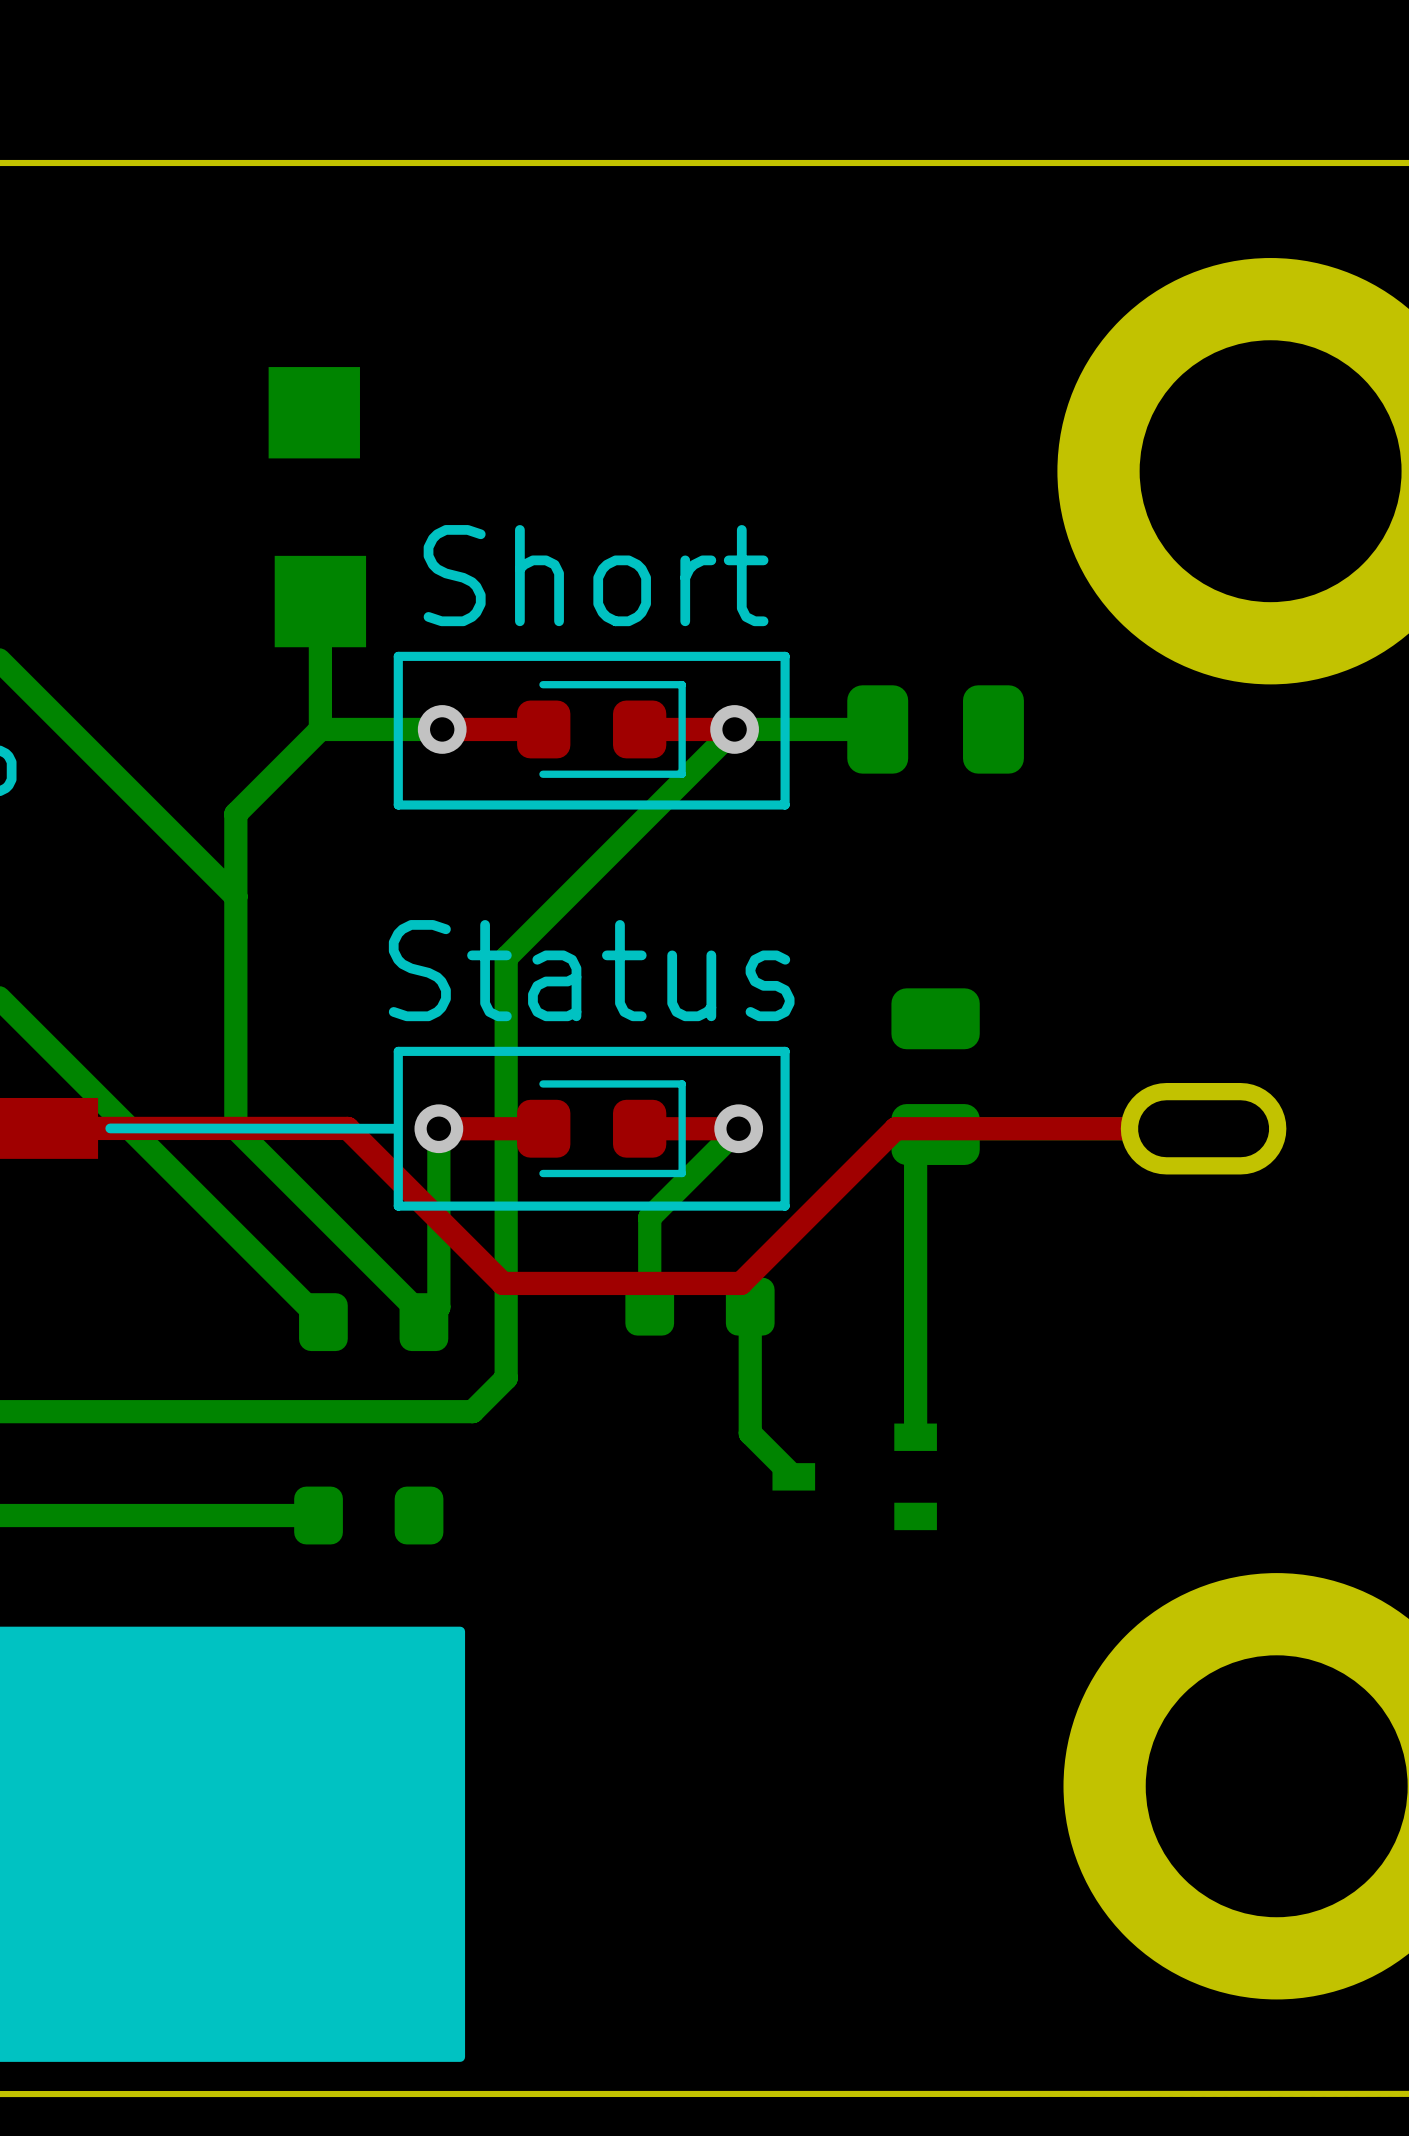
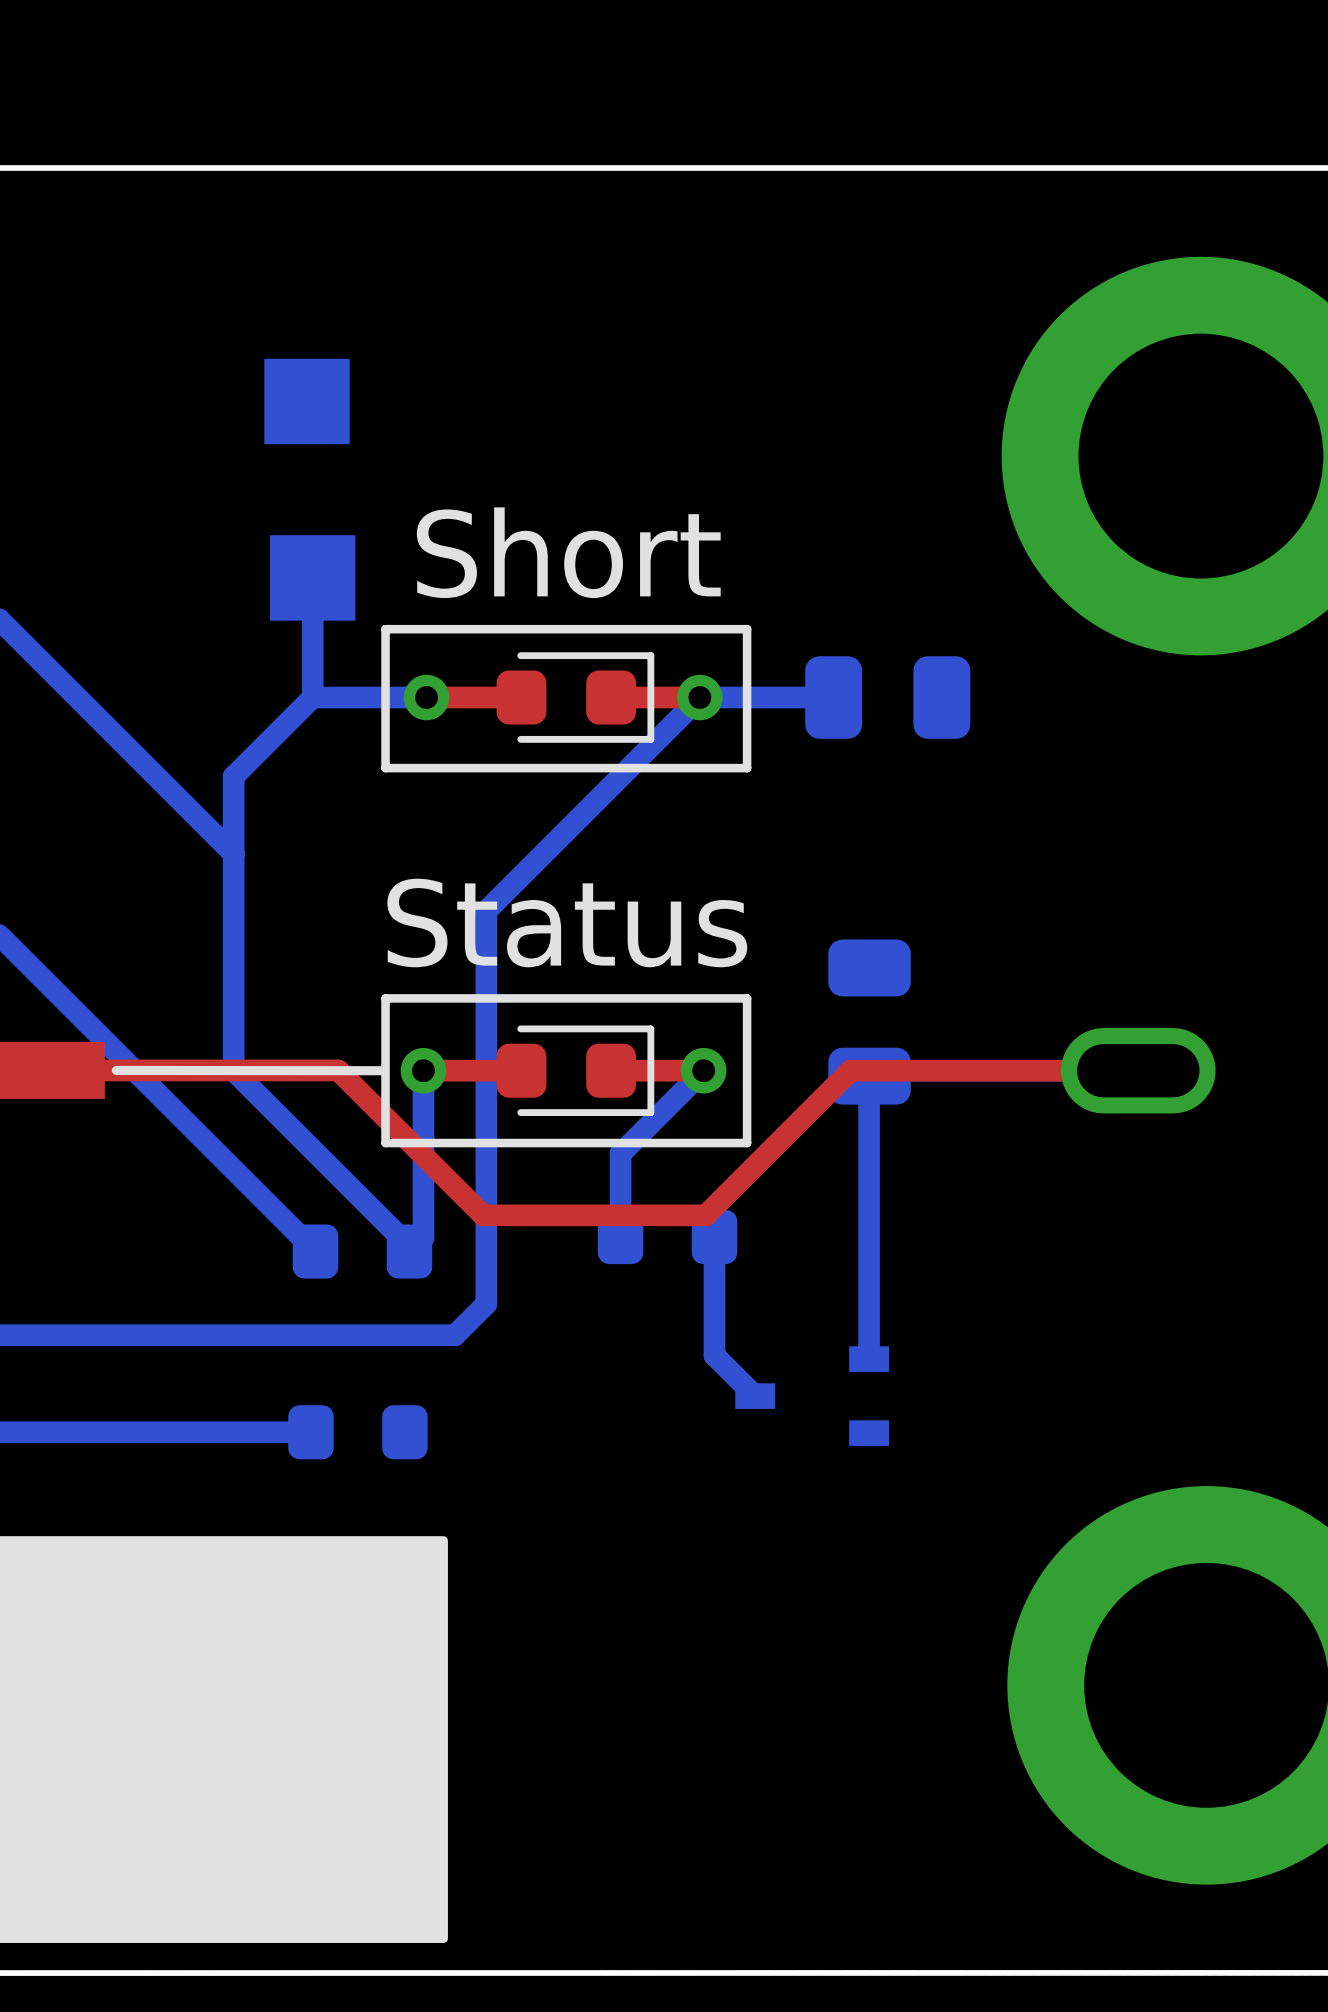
part position: (935, 1076) -> (869, 1022)

